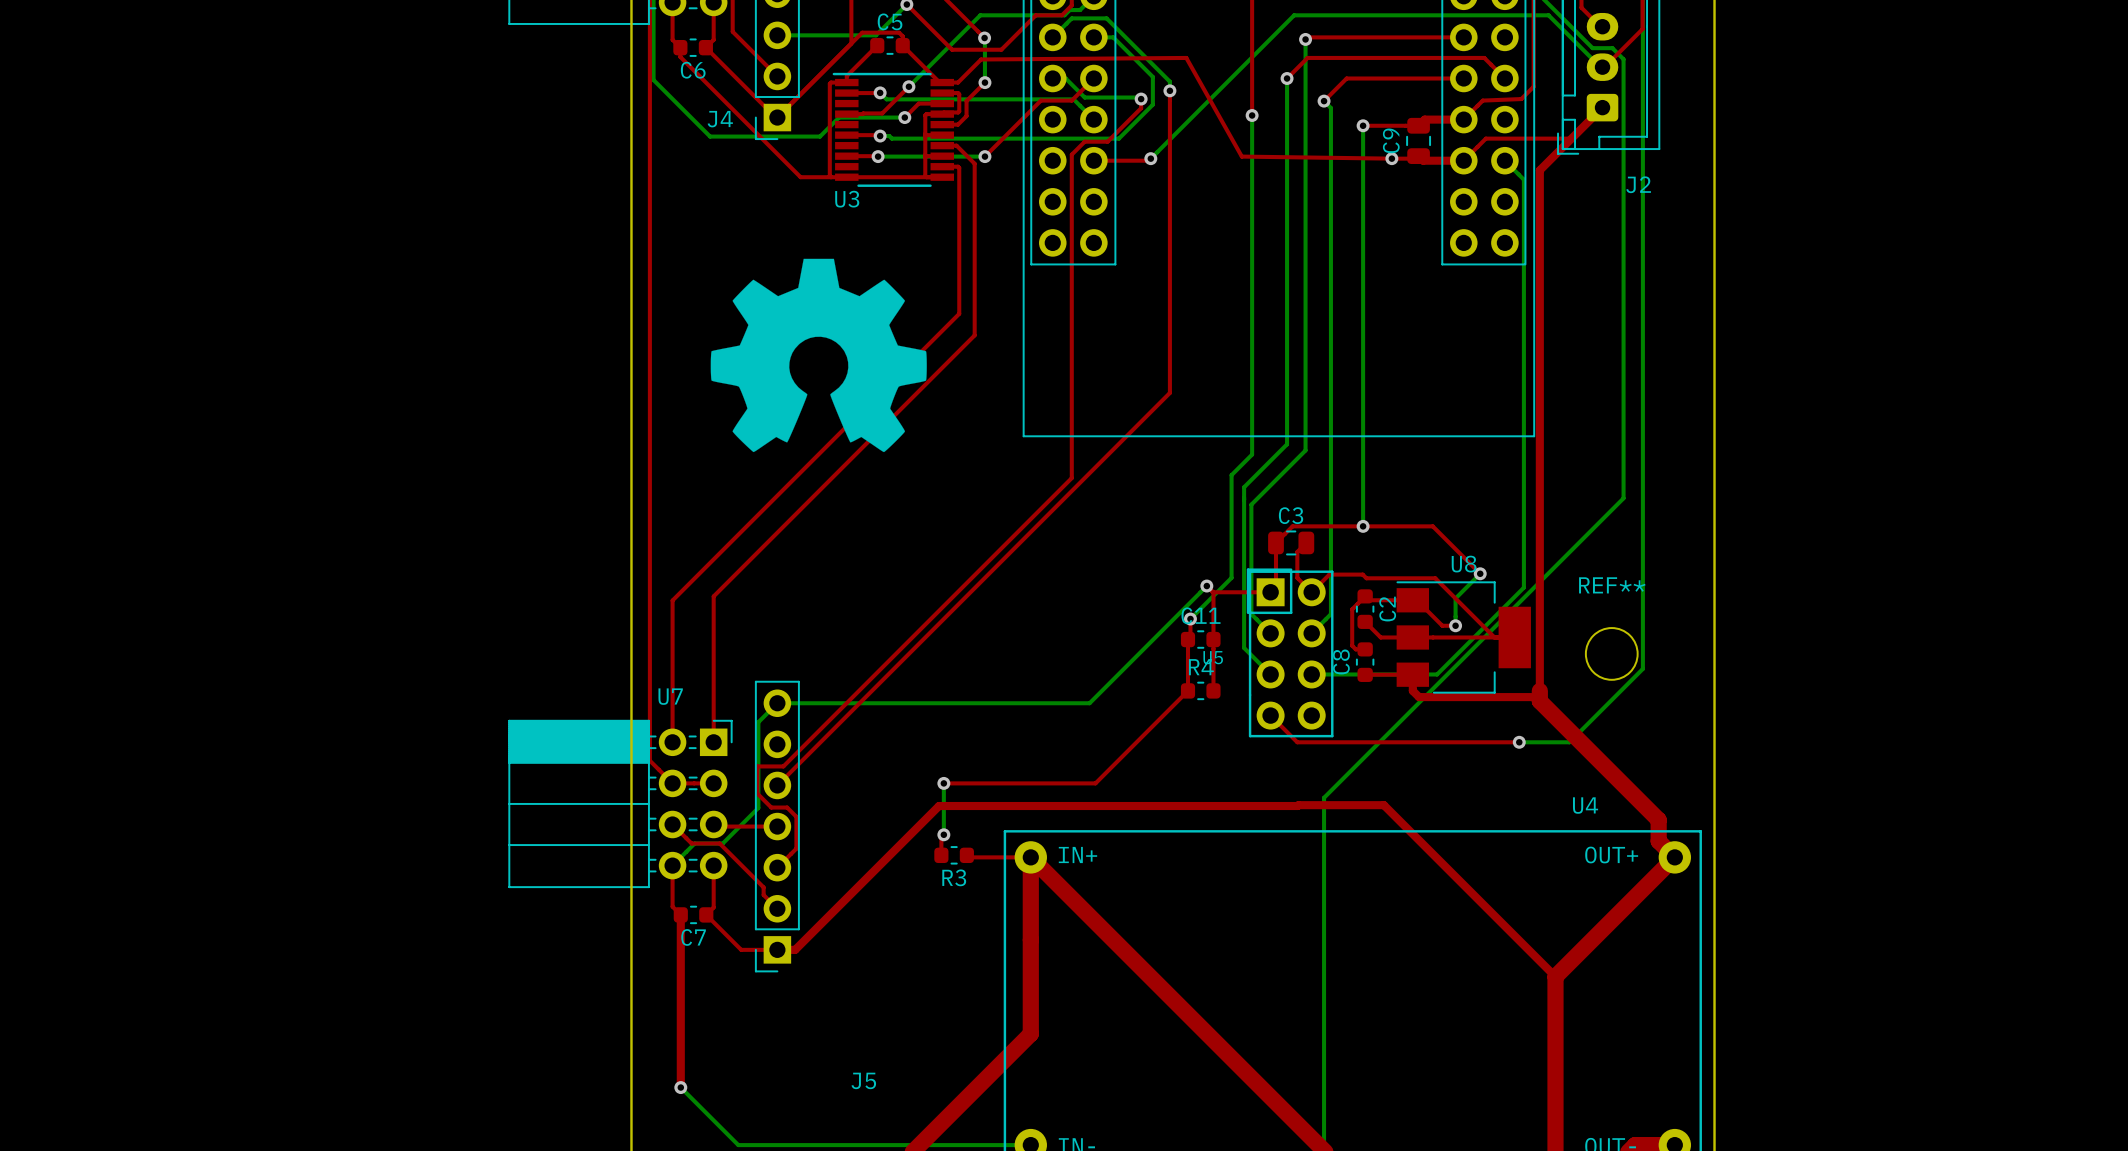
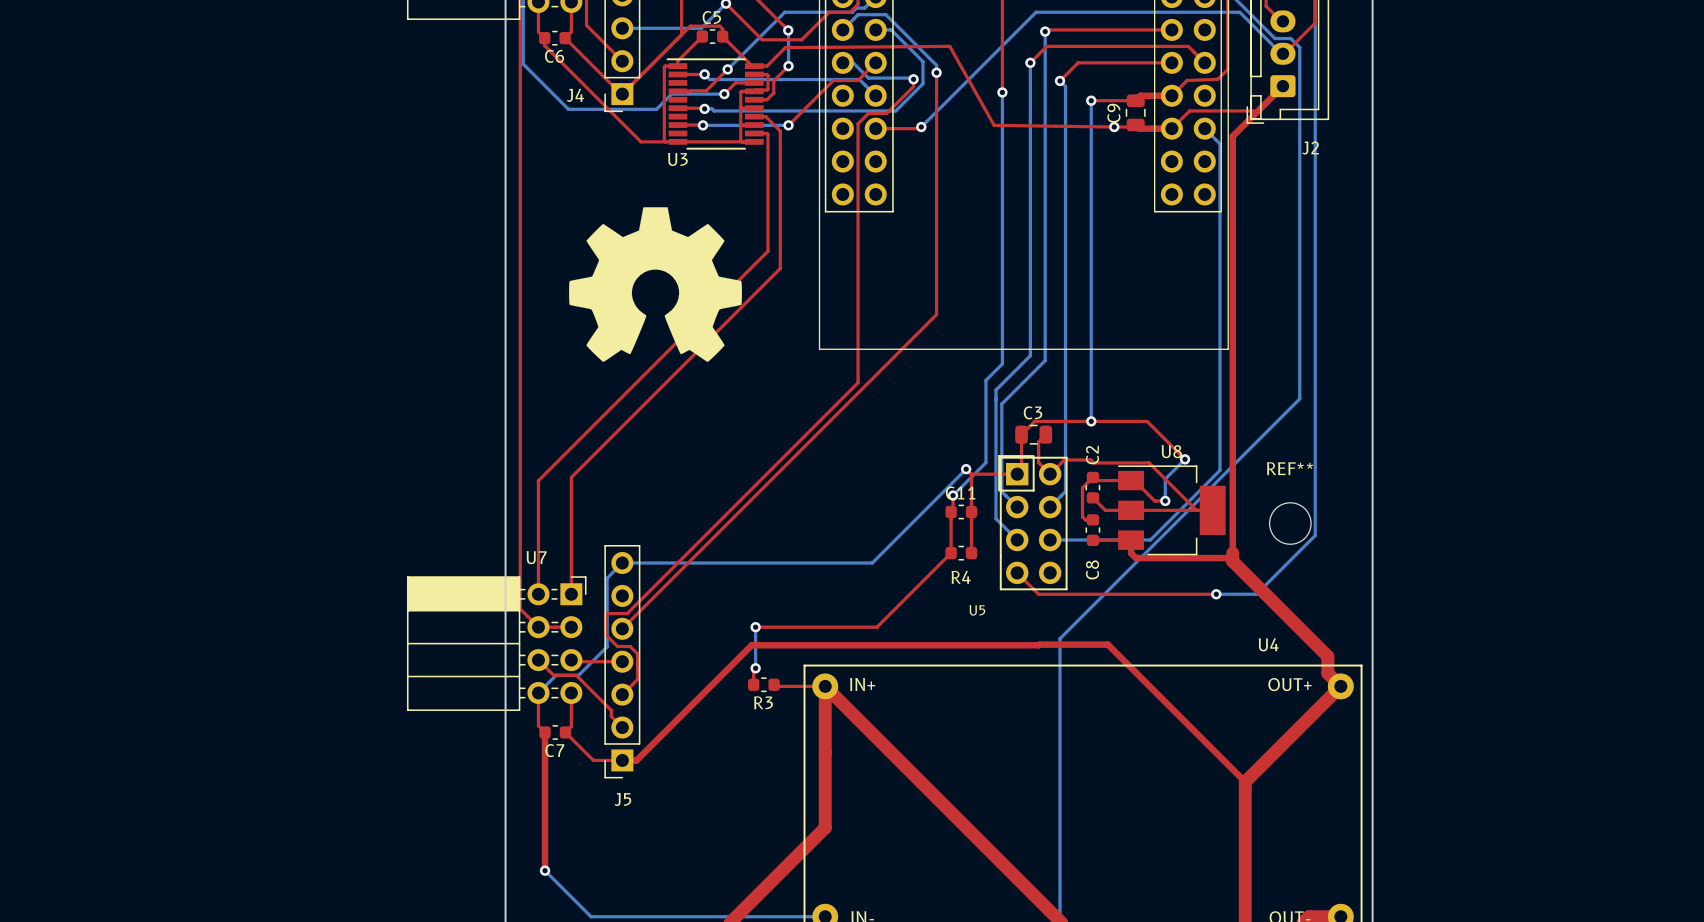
C2 name position: C2 (1387, 609) -> C2 (1092, 455)
U5 name position: U5 (1213, 657) -> U5 (977, 610)
C8 name position: C8 (1341, 661) -> C8 (1092, 569)
R4 name position: R4 (1201, 667) -> R4 (961, 577)
J5 name position: J5 (863, 1080) -> J5 (622, 799)

